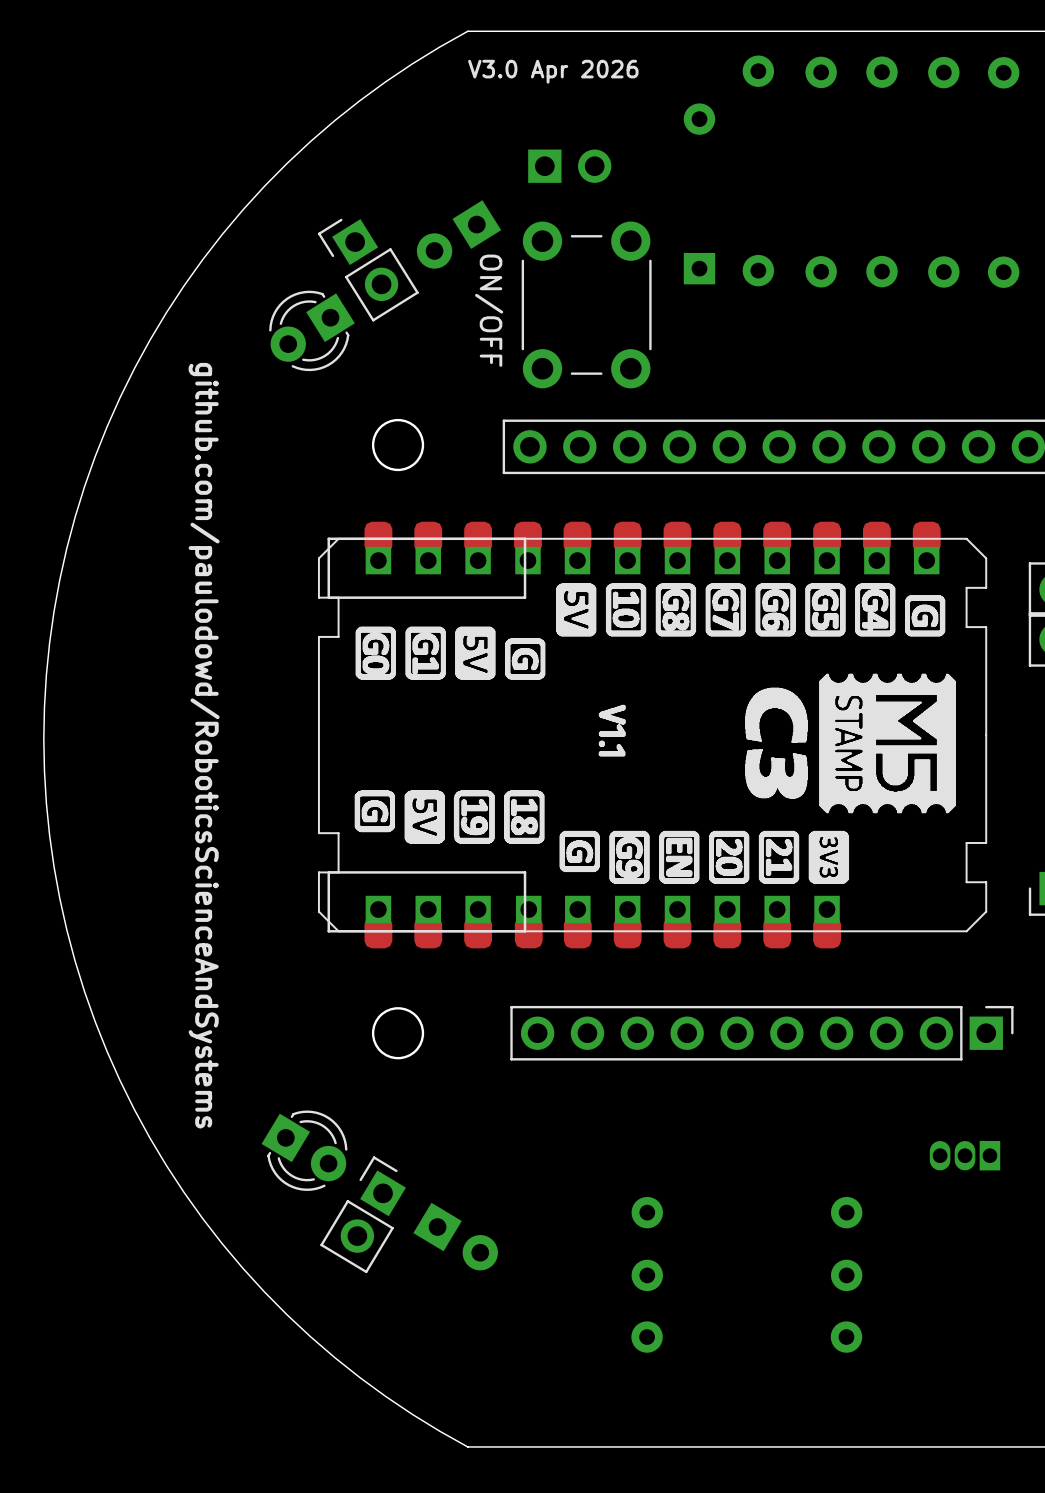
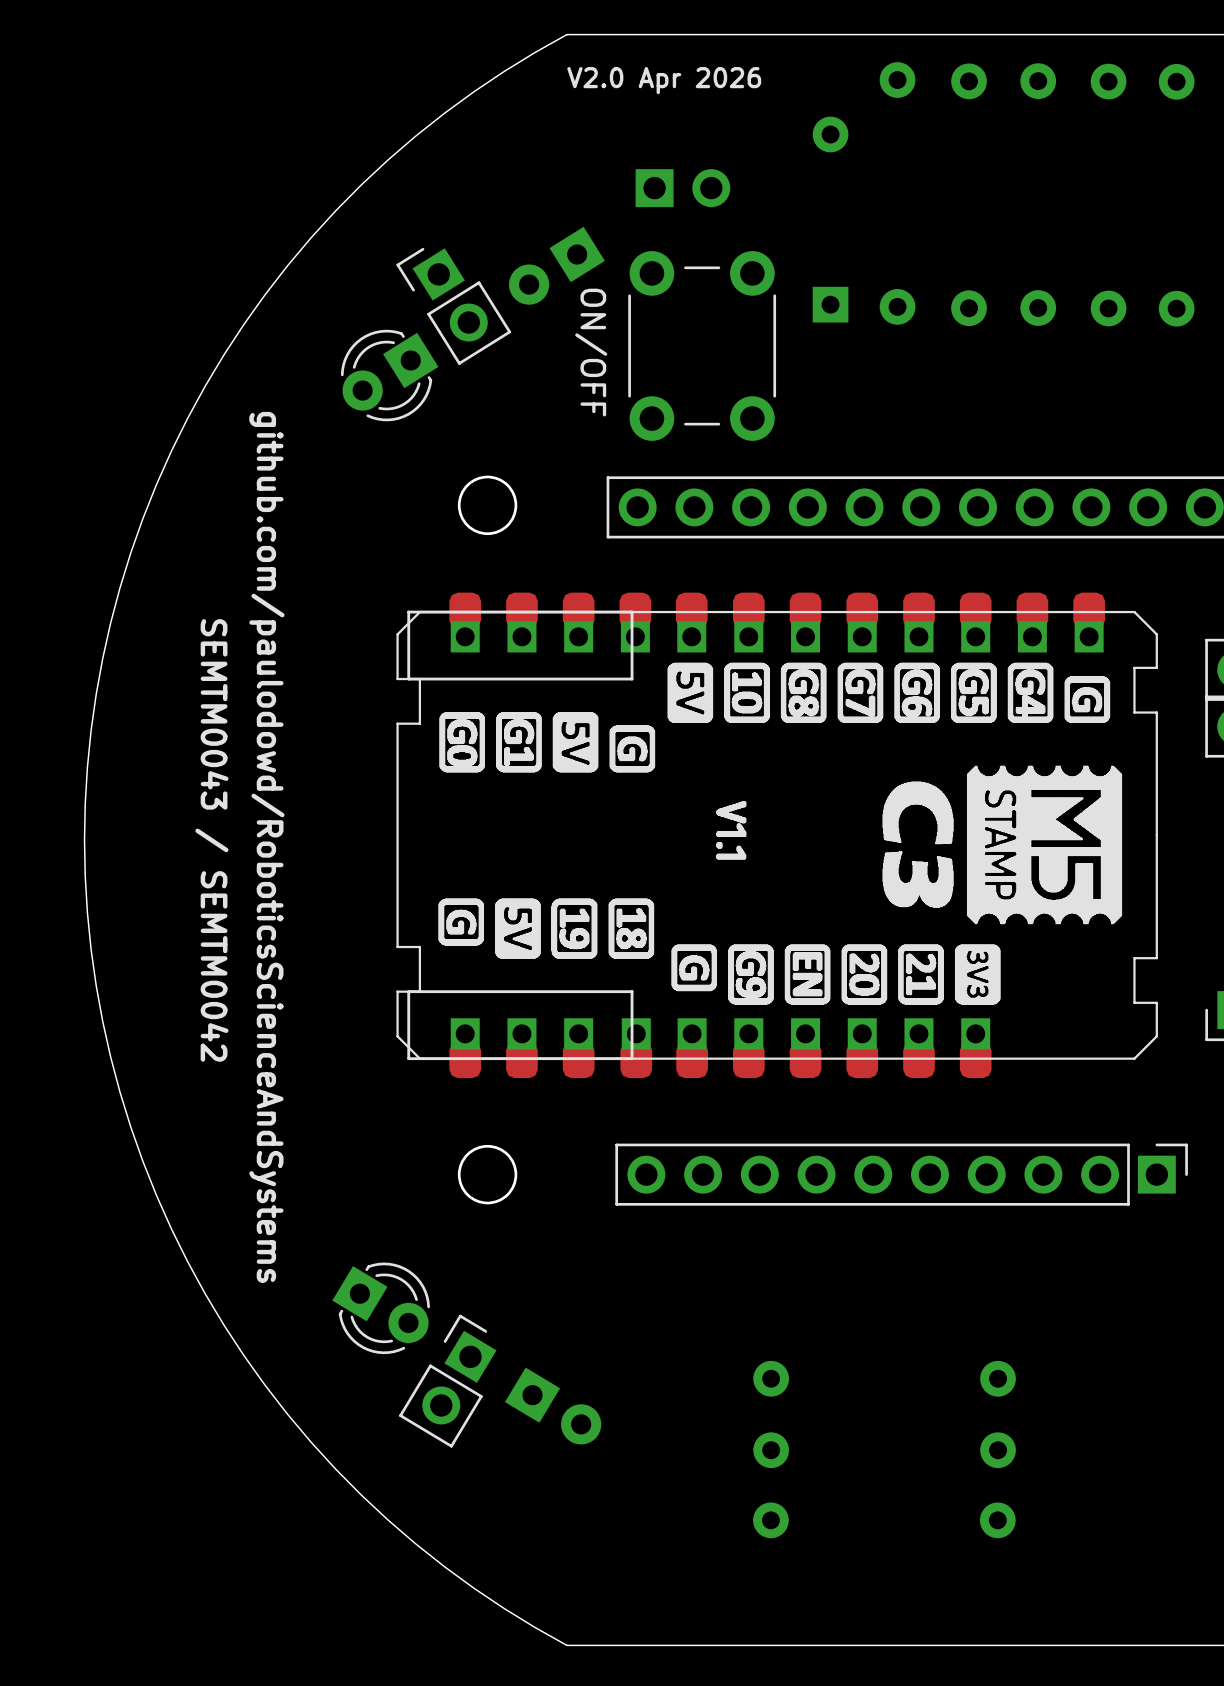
text: V3.0 Apr 2026 (553, 71) -> V2.0 Apr 2026 (664, 80)
text: none -> SEMTM0043 / SEMTM0042 (211, 840)
part: (965, 1155) -> none

